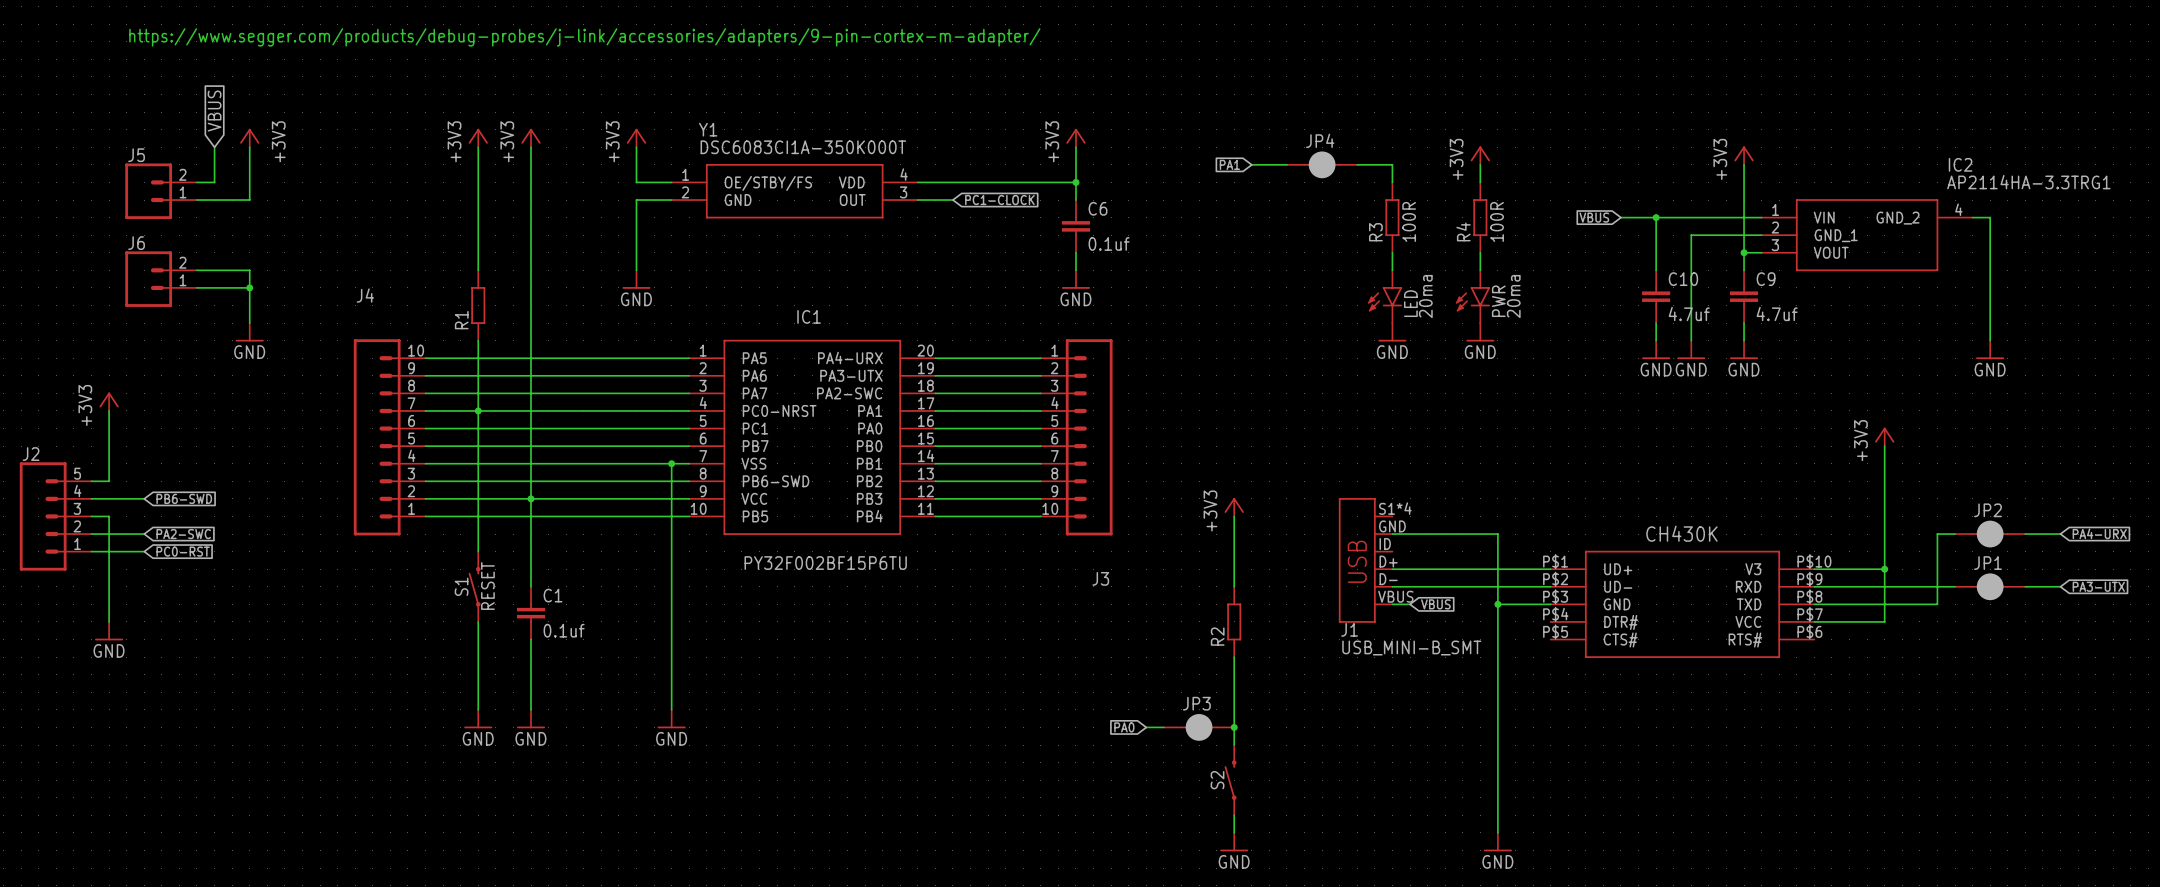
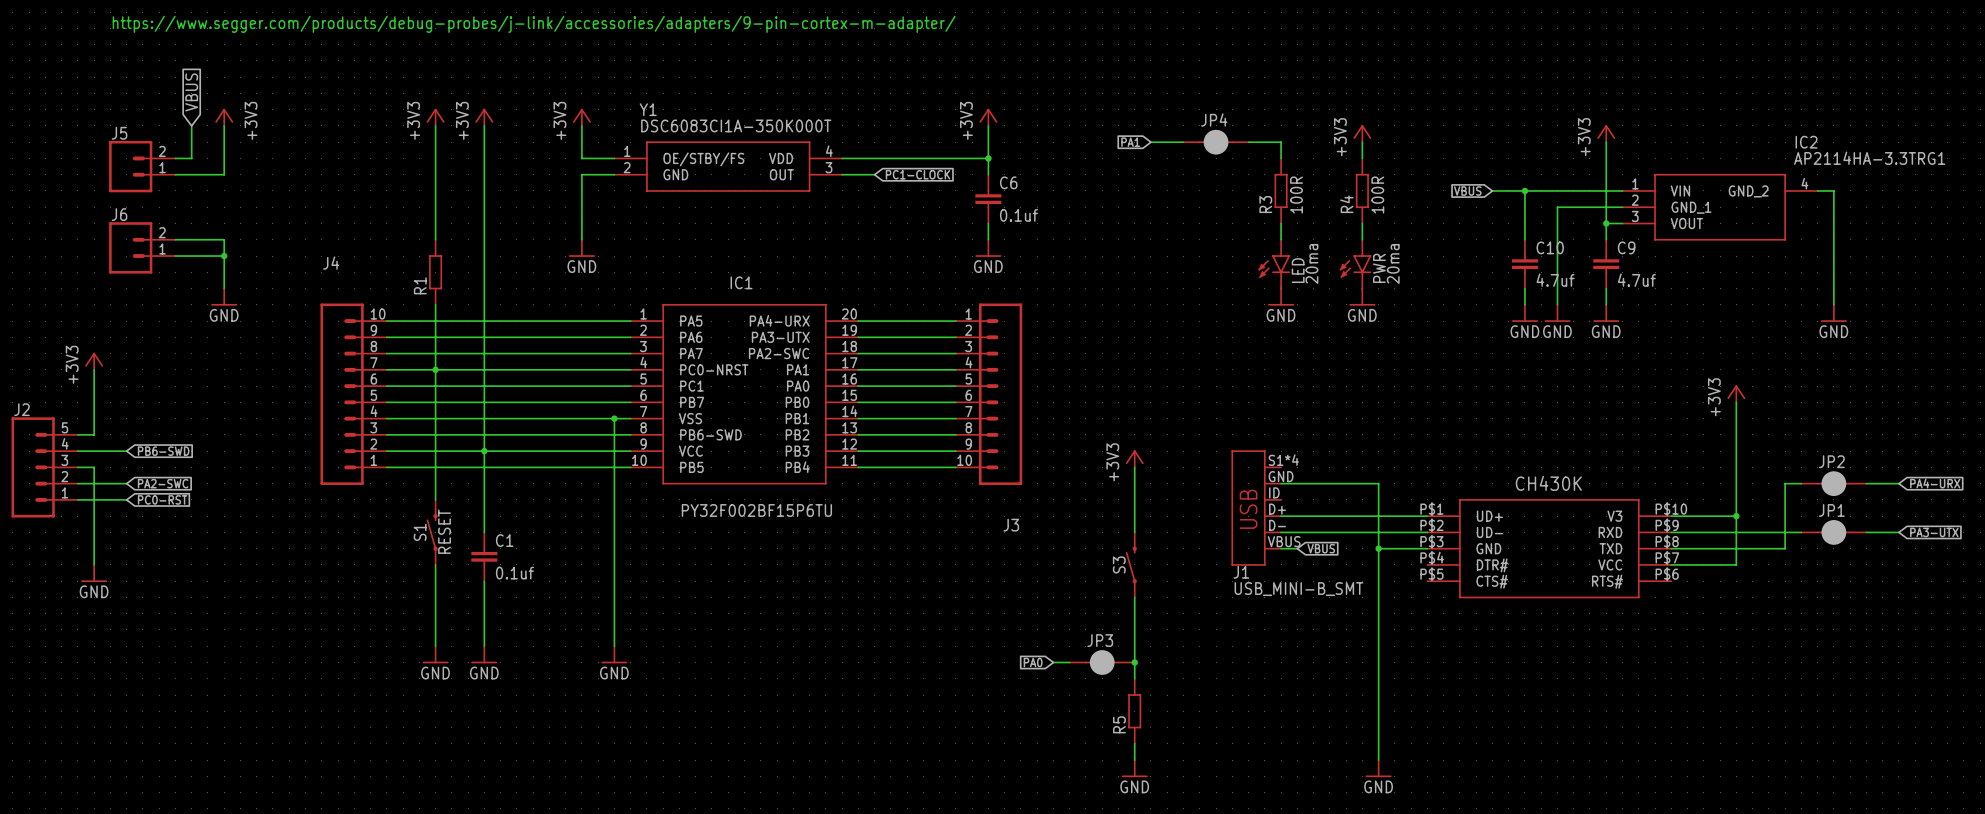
S3: none -> (1131, 564)
R2: (1234, 621) -> none
S2: (1230, 780) -> none
R5: none -> (1134, 711)

